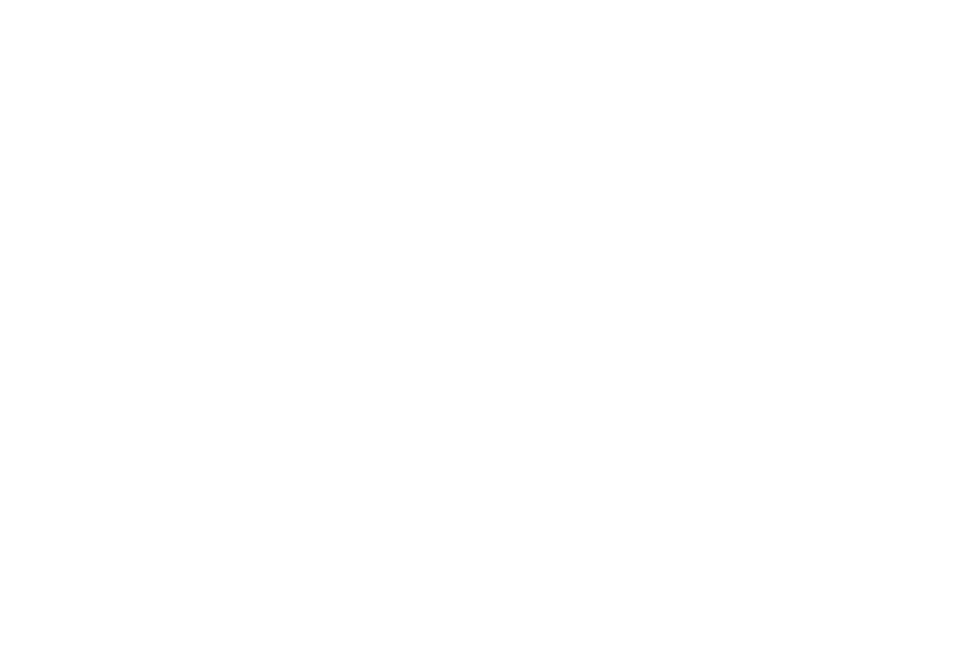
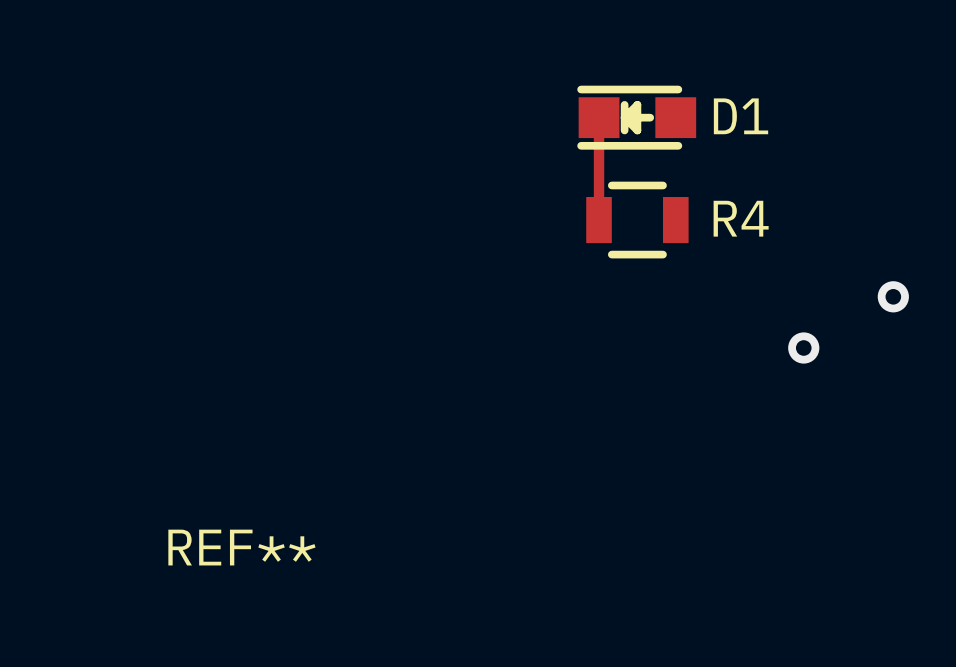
track: none -> (599, 117) (599, 220)
D1: none -> (636, 117)
R4: none -> (637, 220)
via: none -> (893, 296)
via: none -> (803, 347)
REF**: none -> (241, 547)

